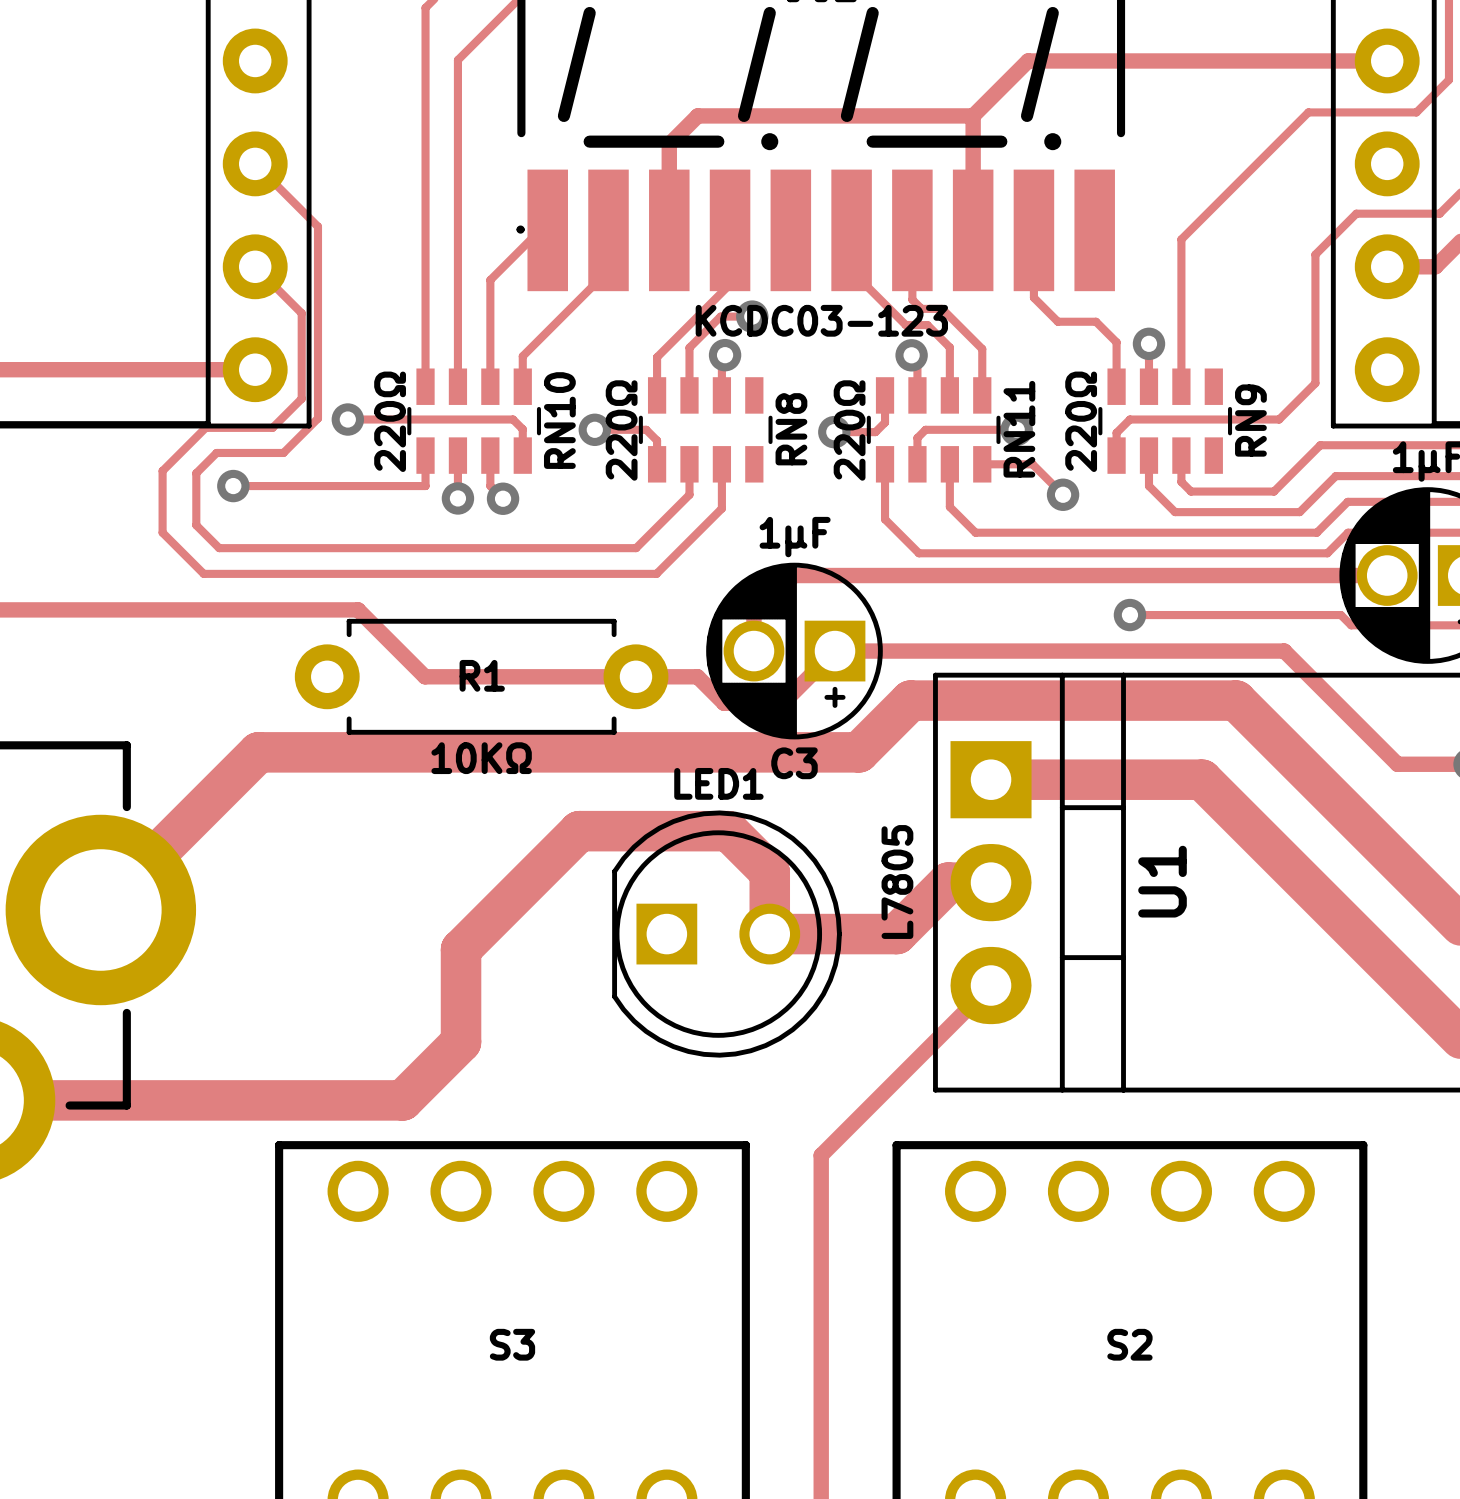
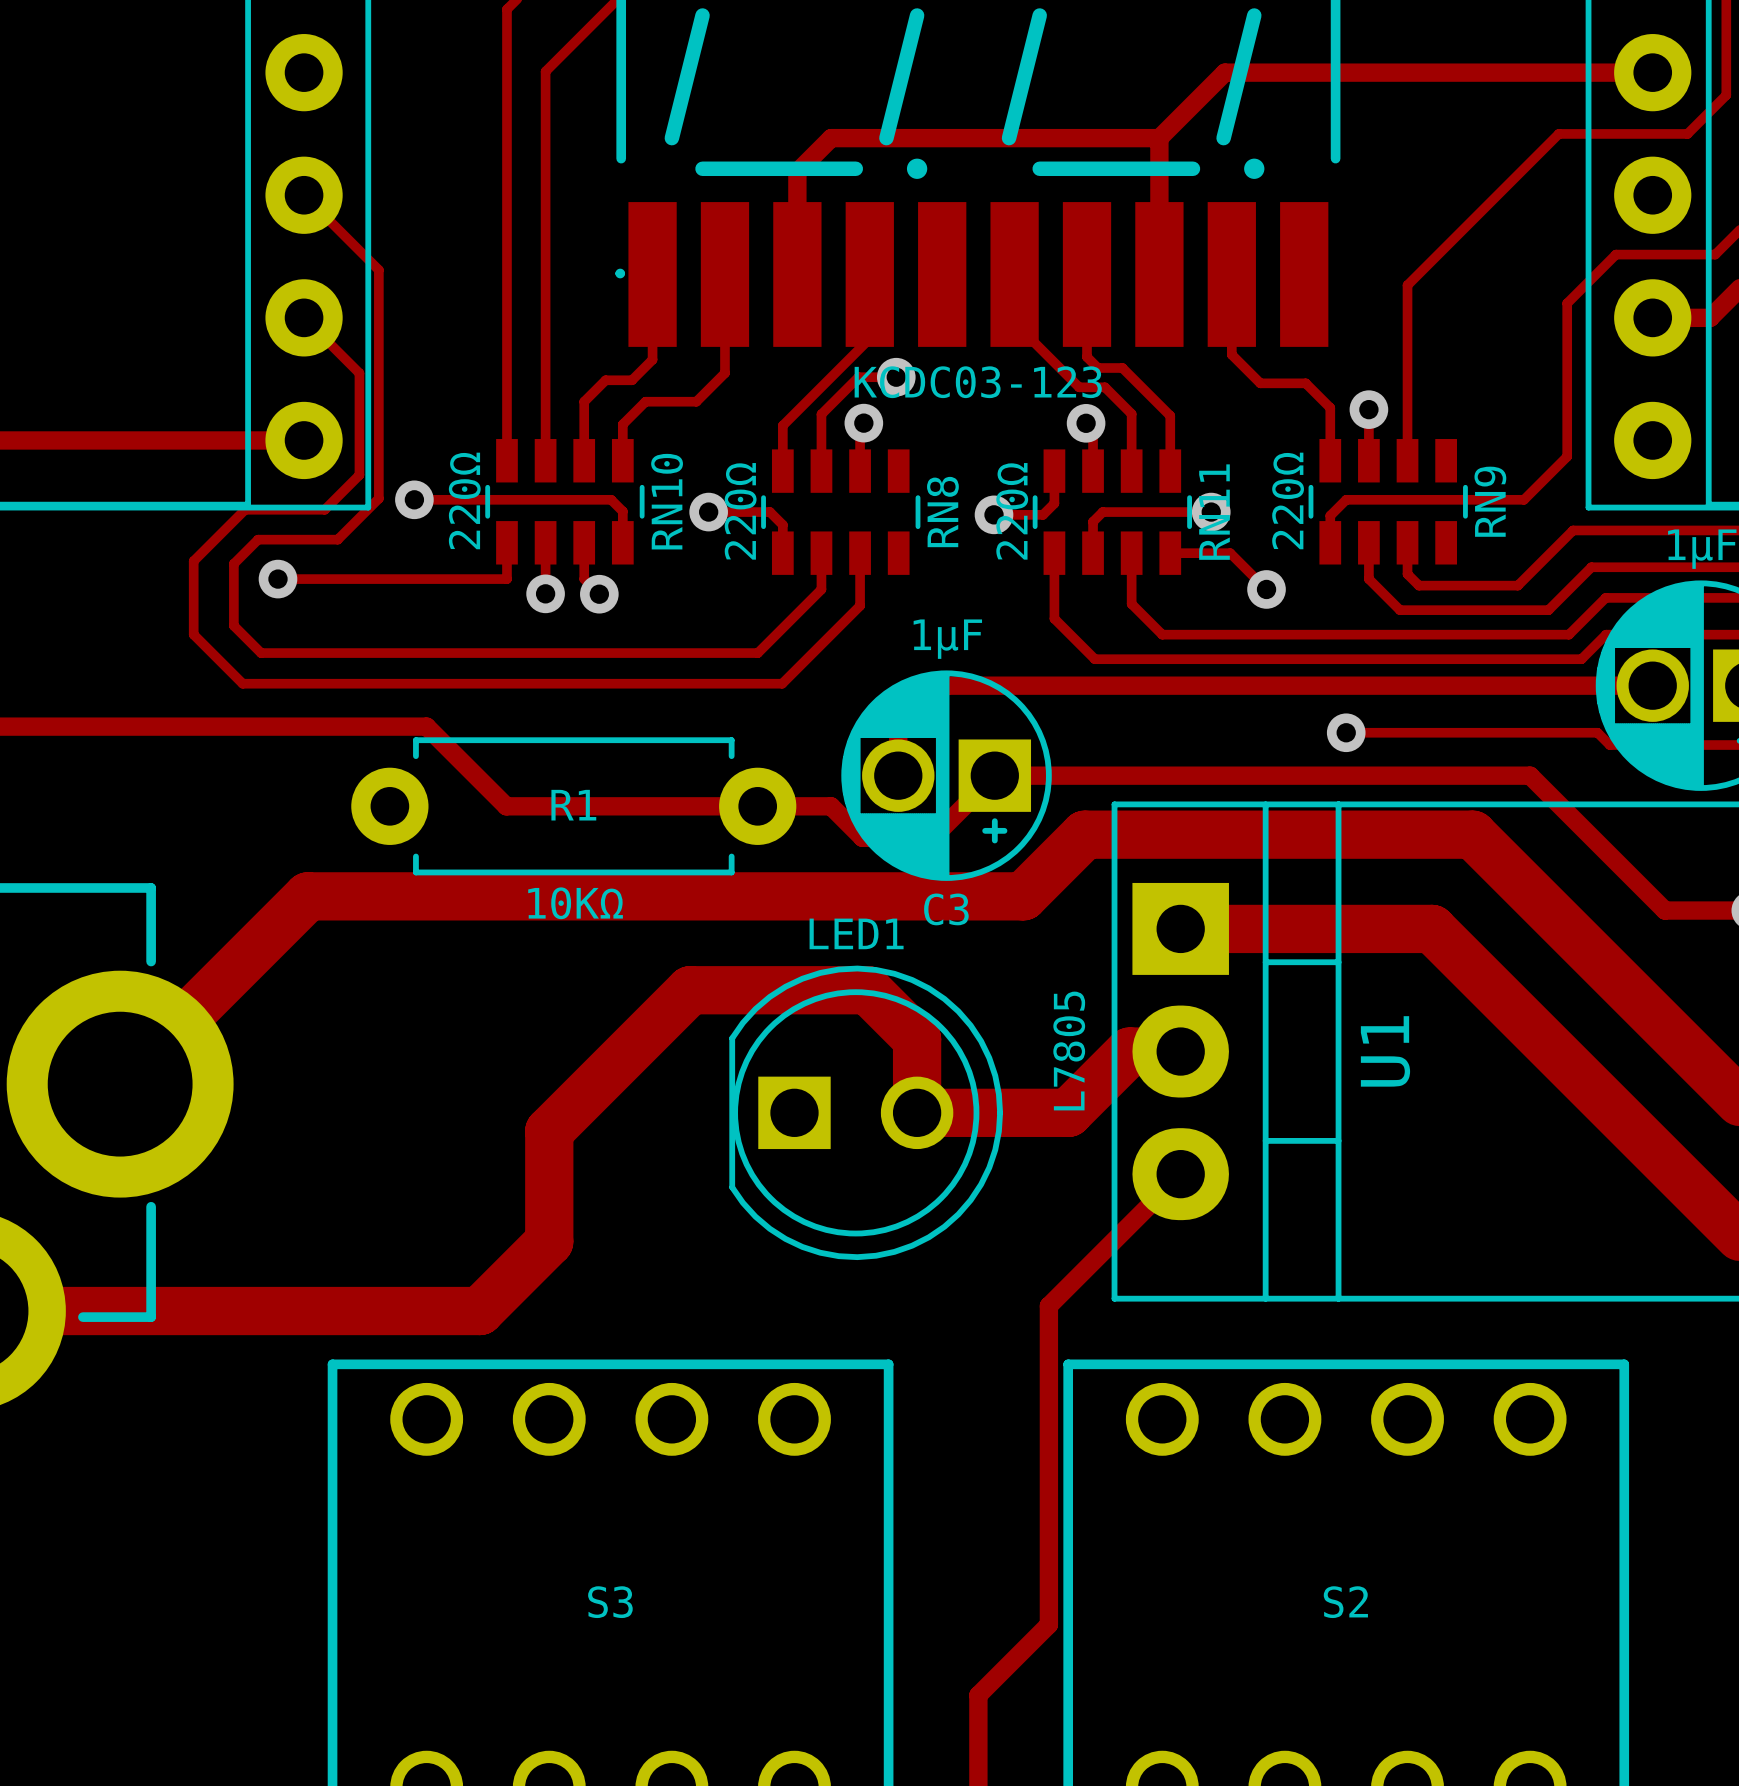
track: (540, 230) (490, 280) (490, 337) -> (652, 274) (652, 359) (632, 380) (605, 380) (584, 401)
track: (608, 270) (541, 337) -> (724, 274) (724, 373) (696, 401) (645, 401)
track: (880, 1096) (821, 1155) (821, 1422) -> (1048, 1305) (1048, 1624) (978, 1695)

